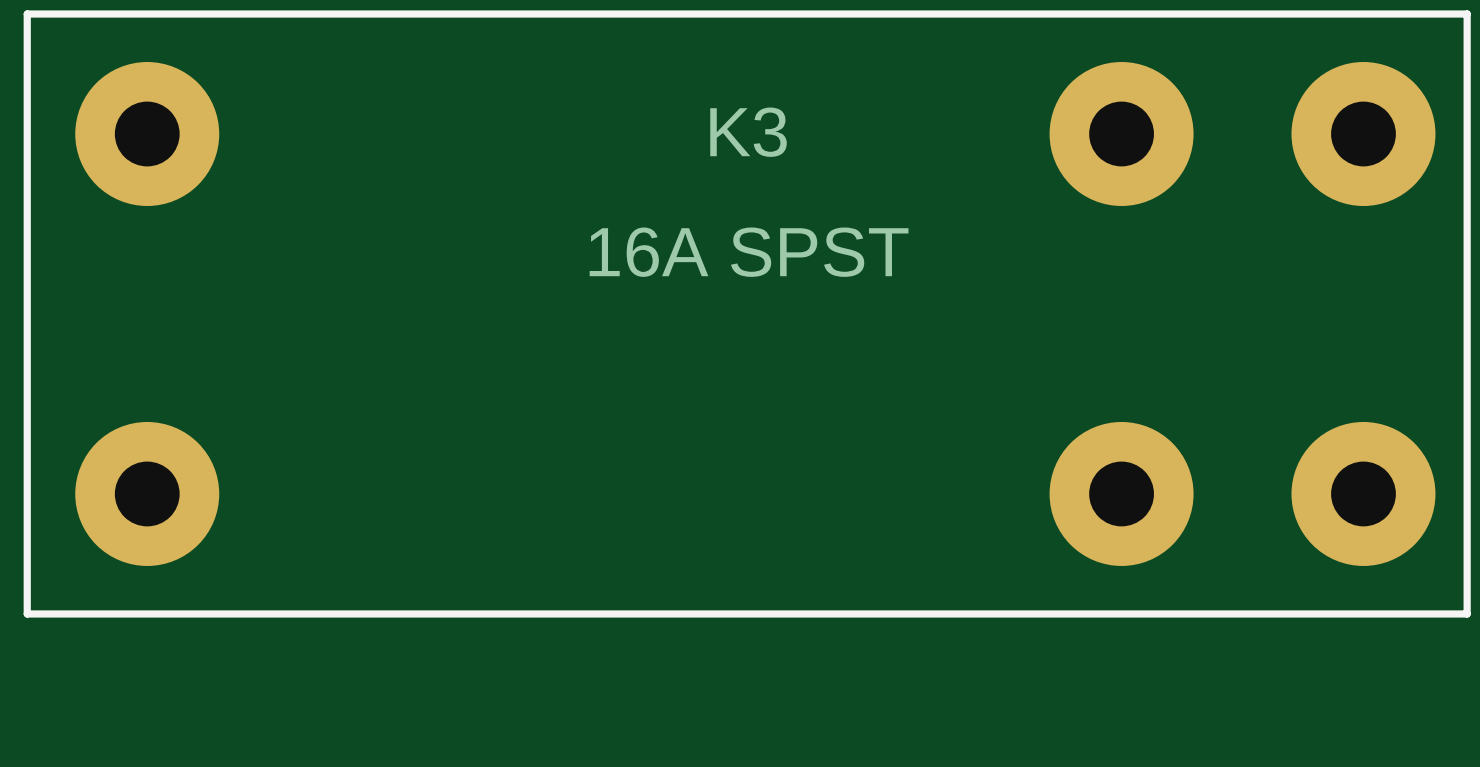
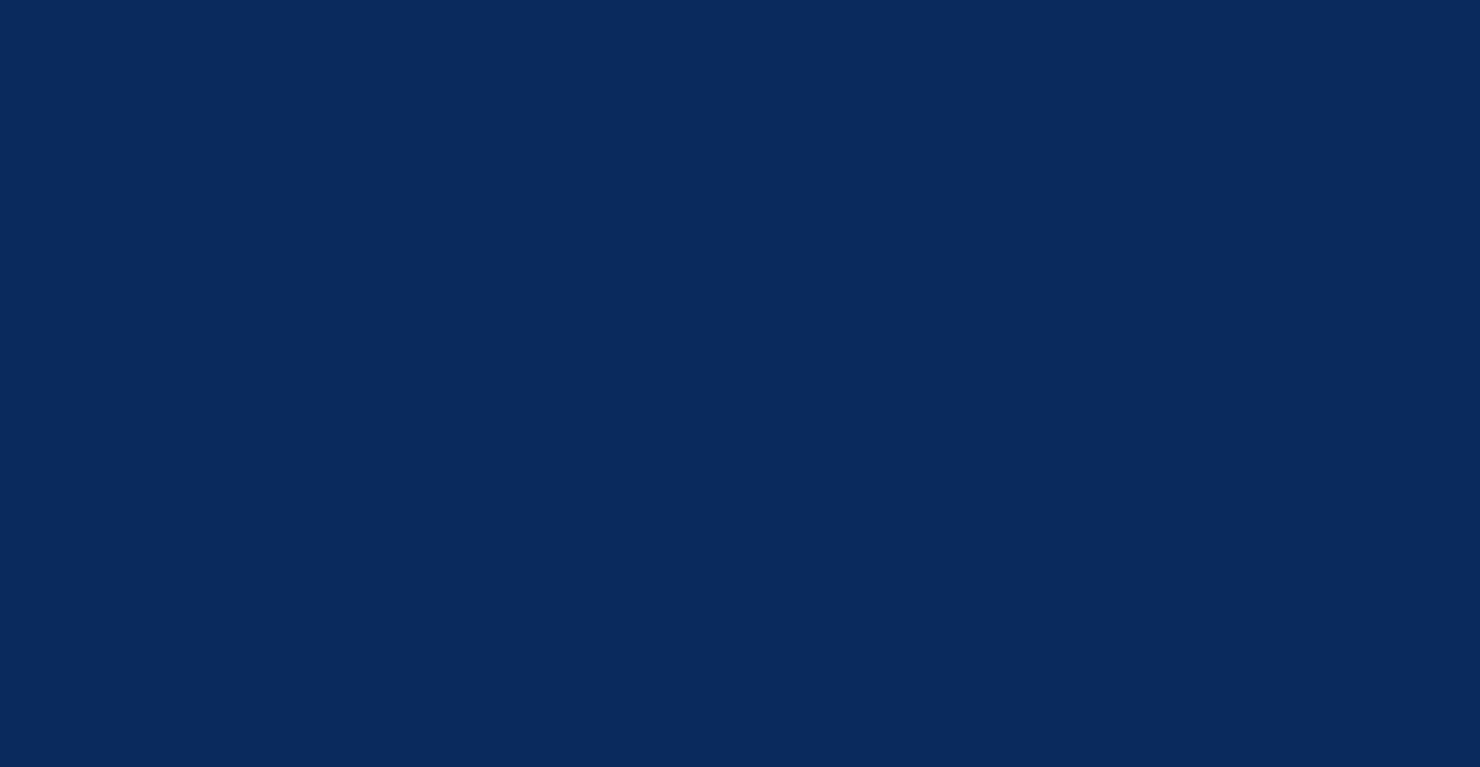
K3: 16A SPST (747, 313) -> none

